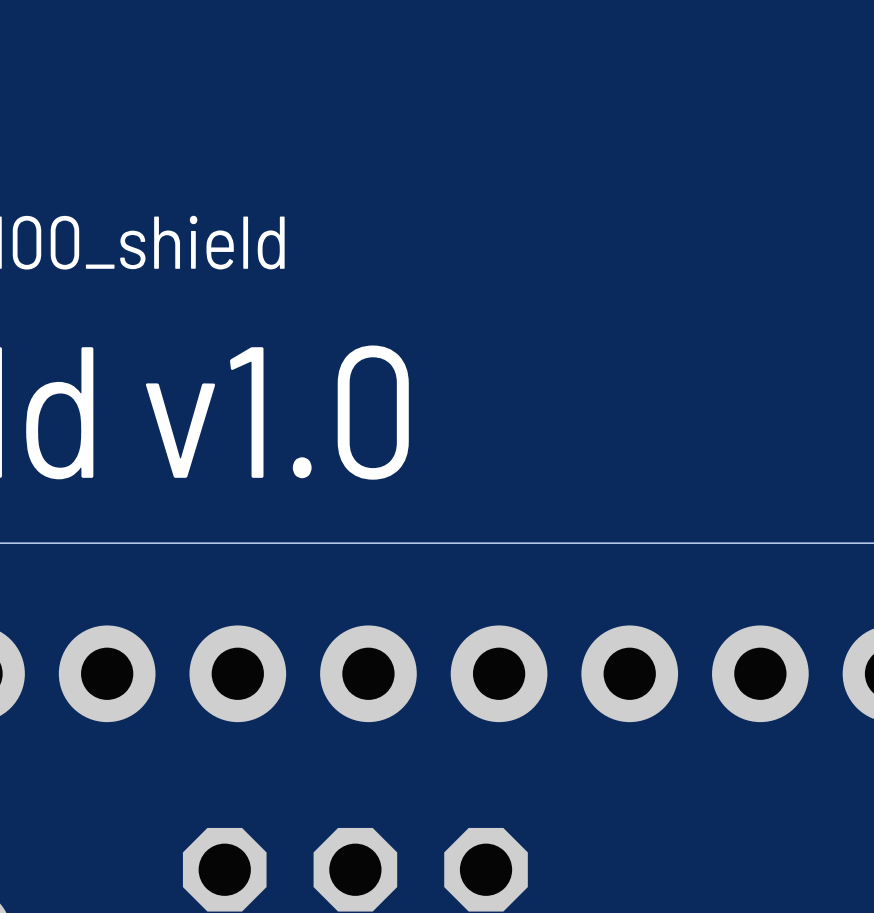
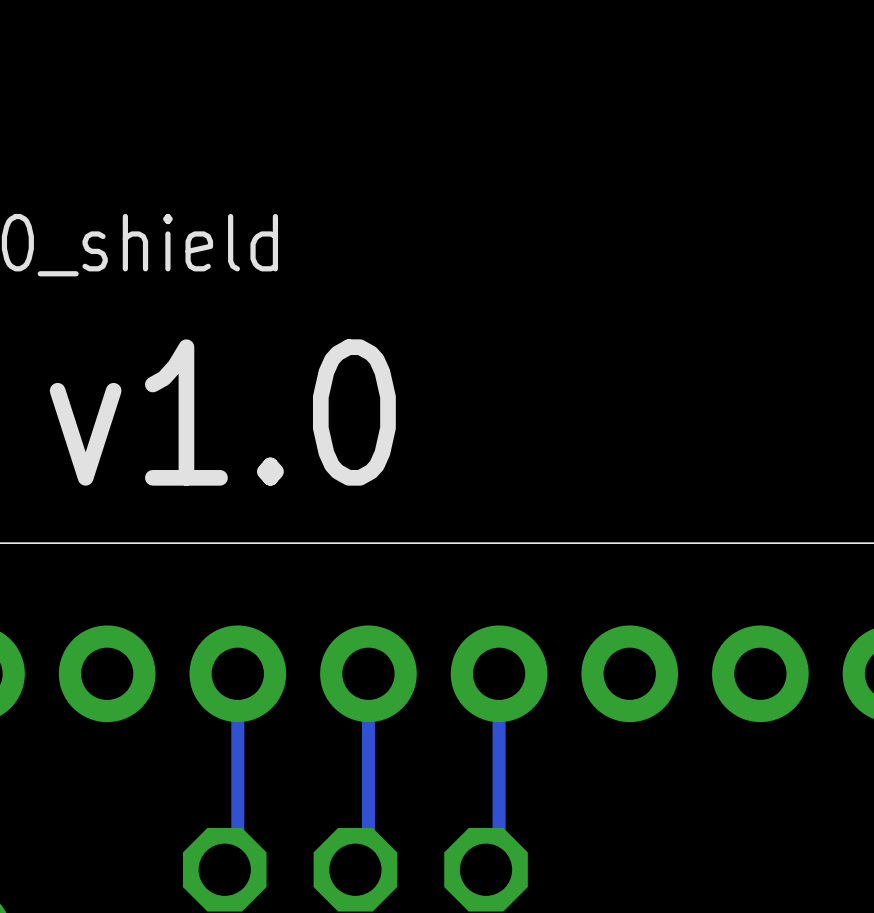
track: none -> (237, 673) (237, 856) (224, 869)
track: none -> (368, 673) (368, 856) (355, 869)
track: none -> (499, 673) (499, 856) (486, 869)

